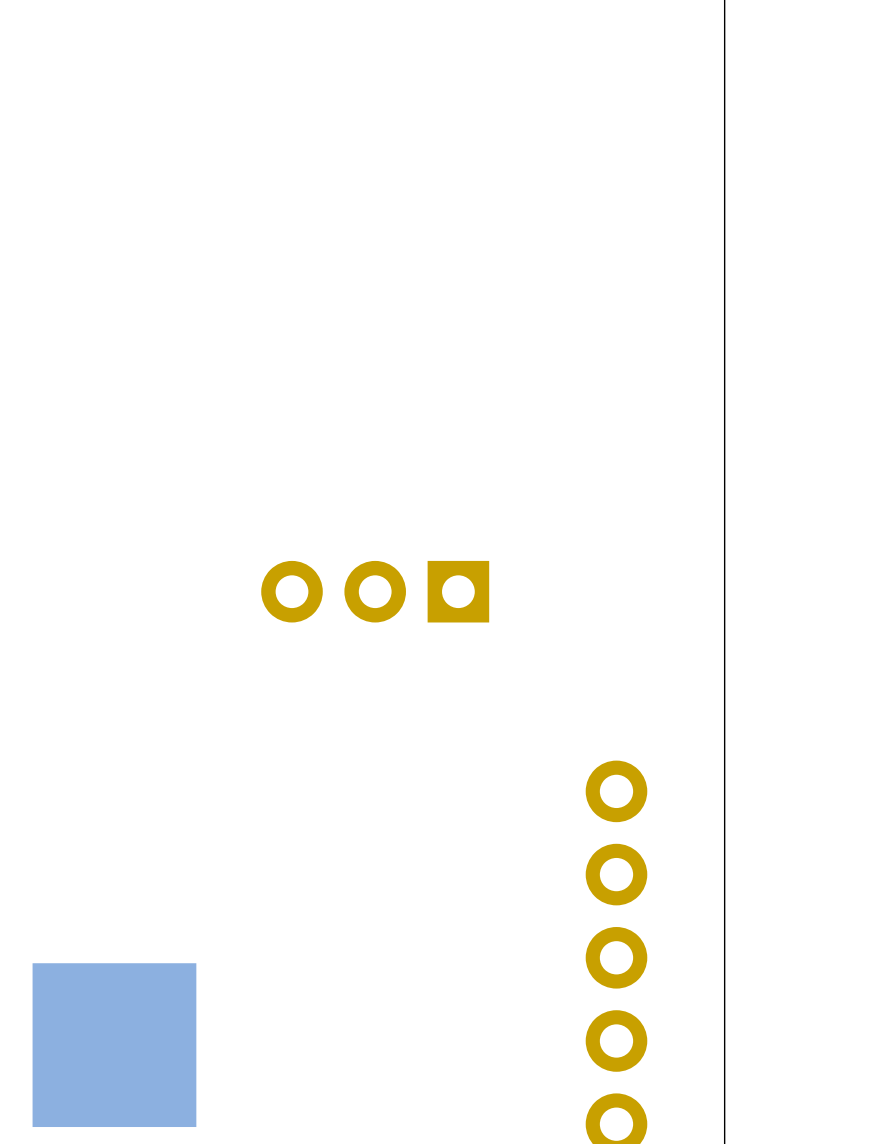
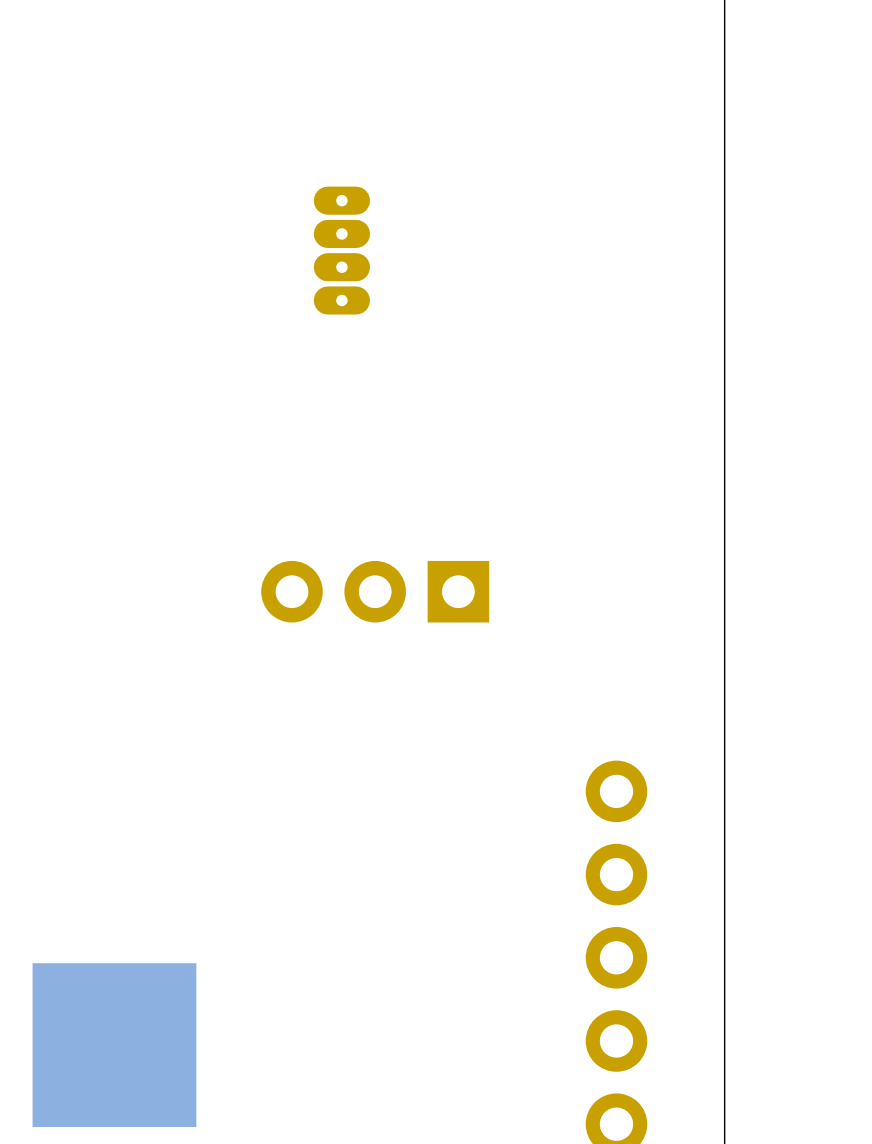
part: none -> (341, 250)

